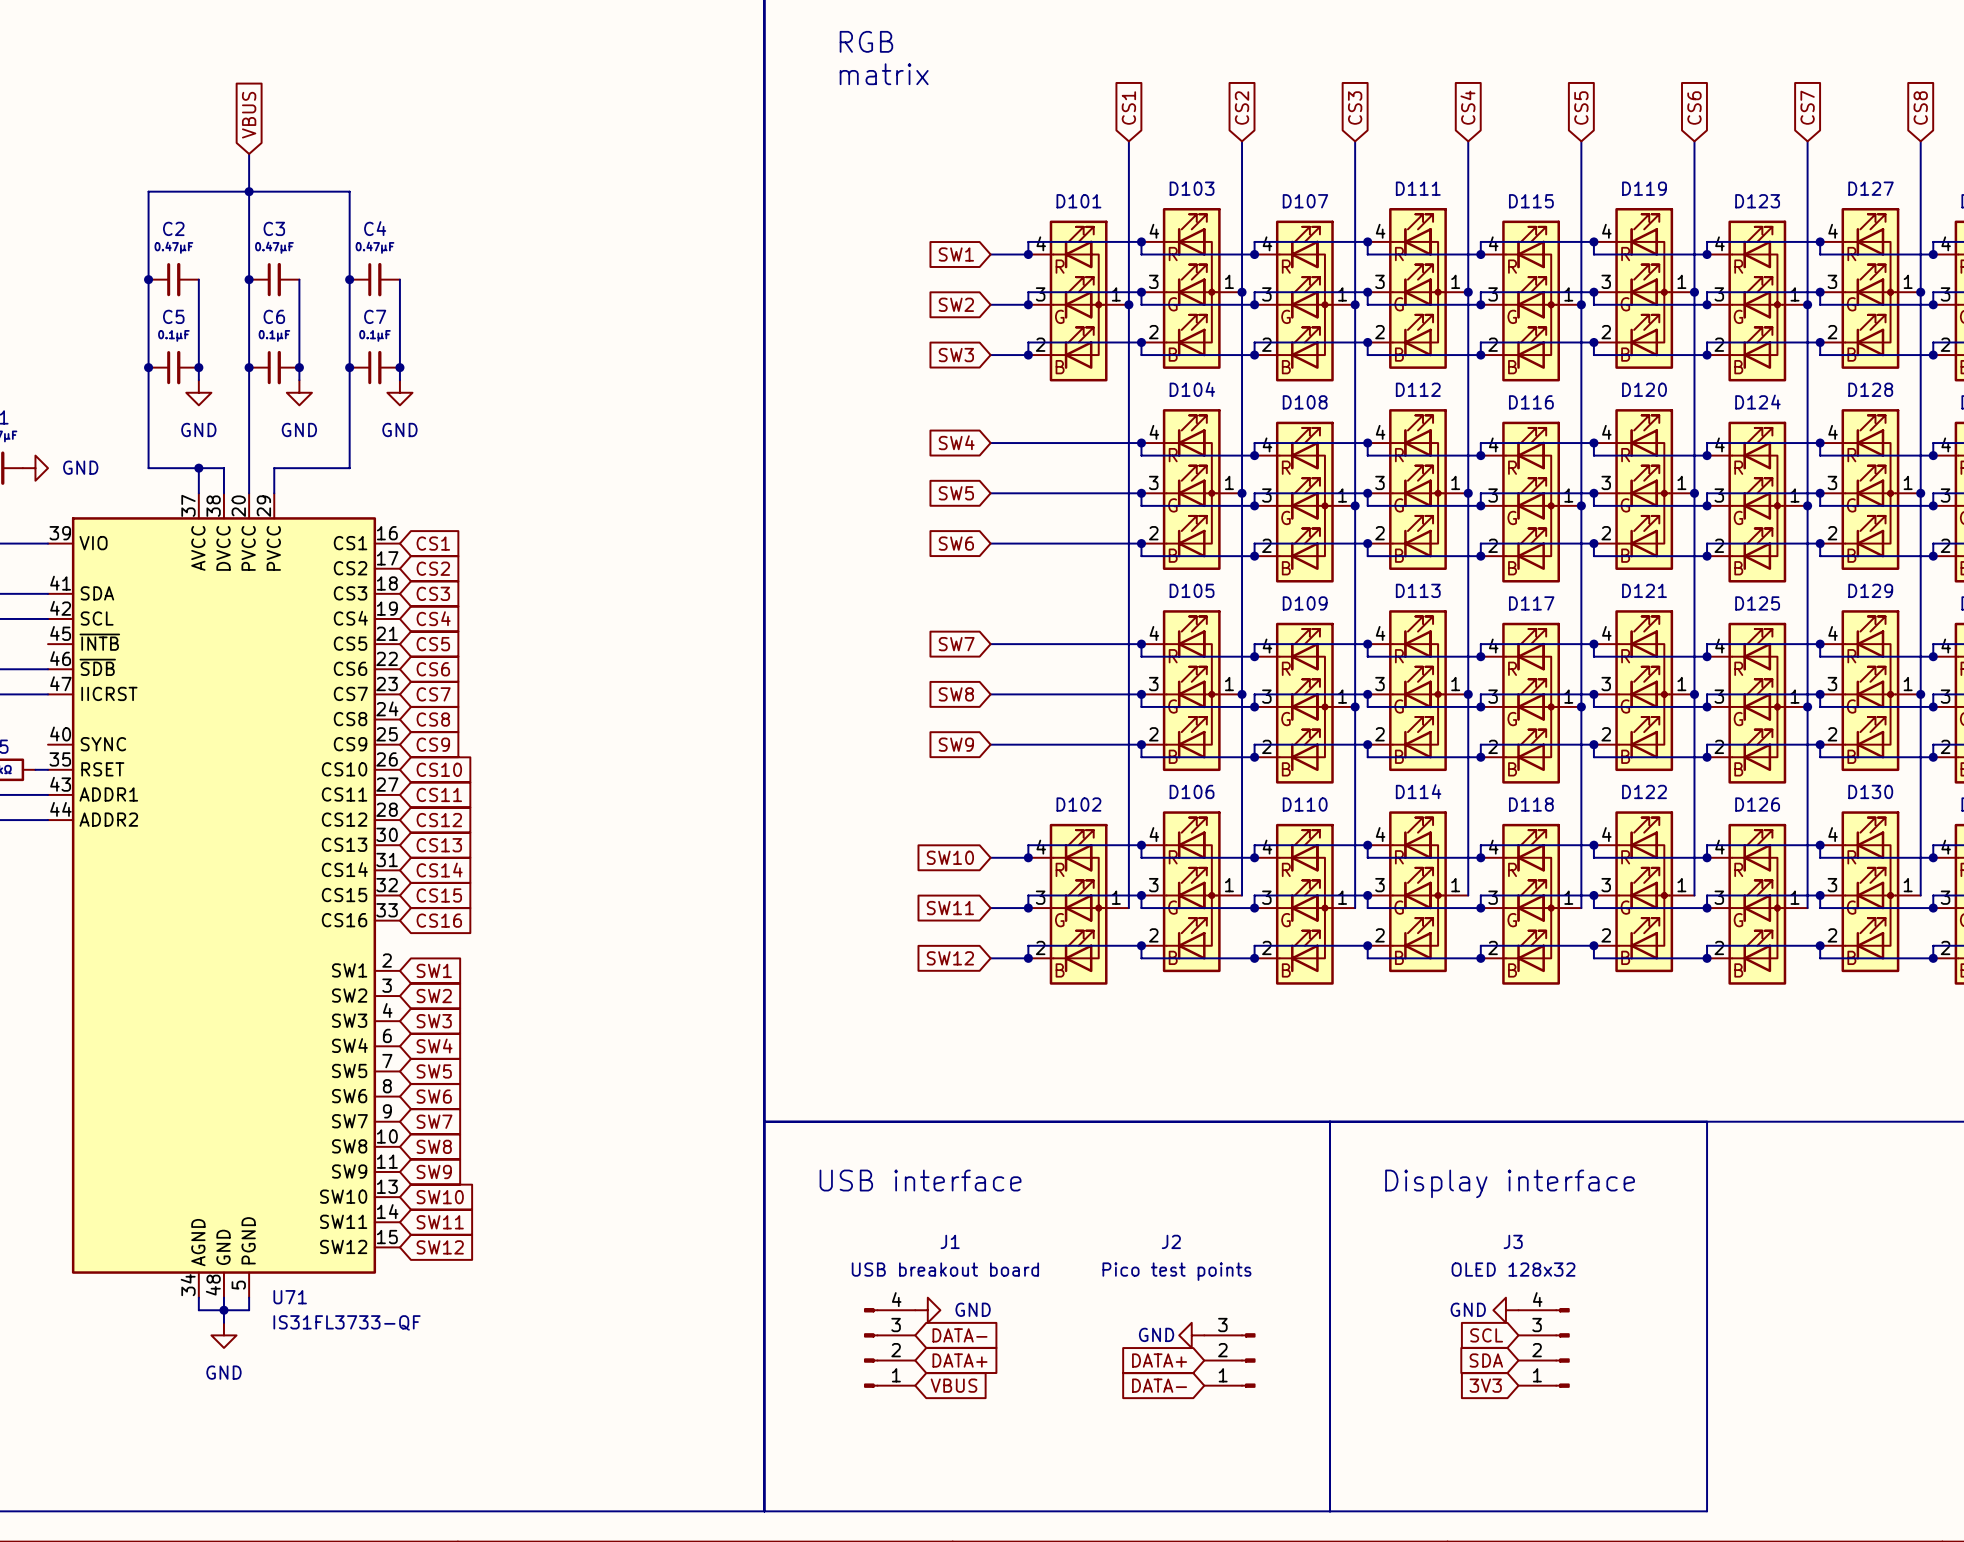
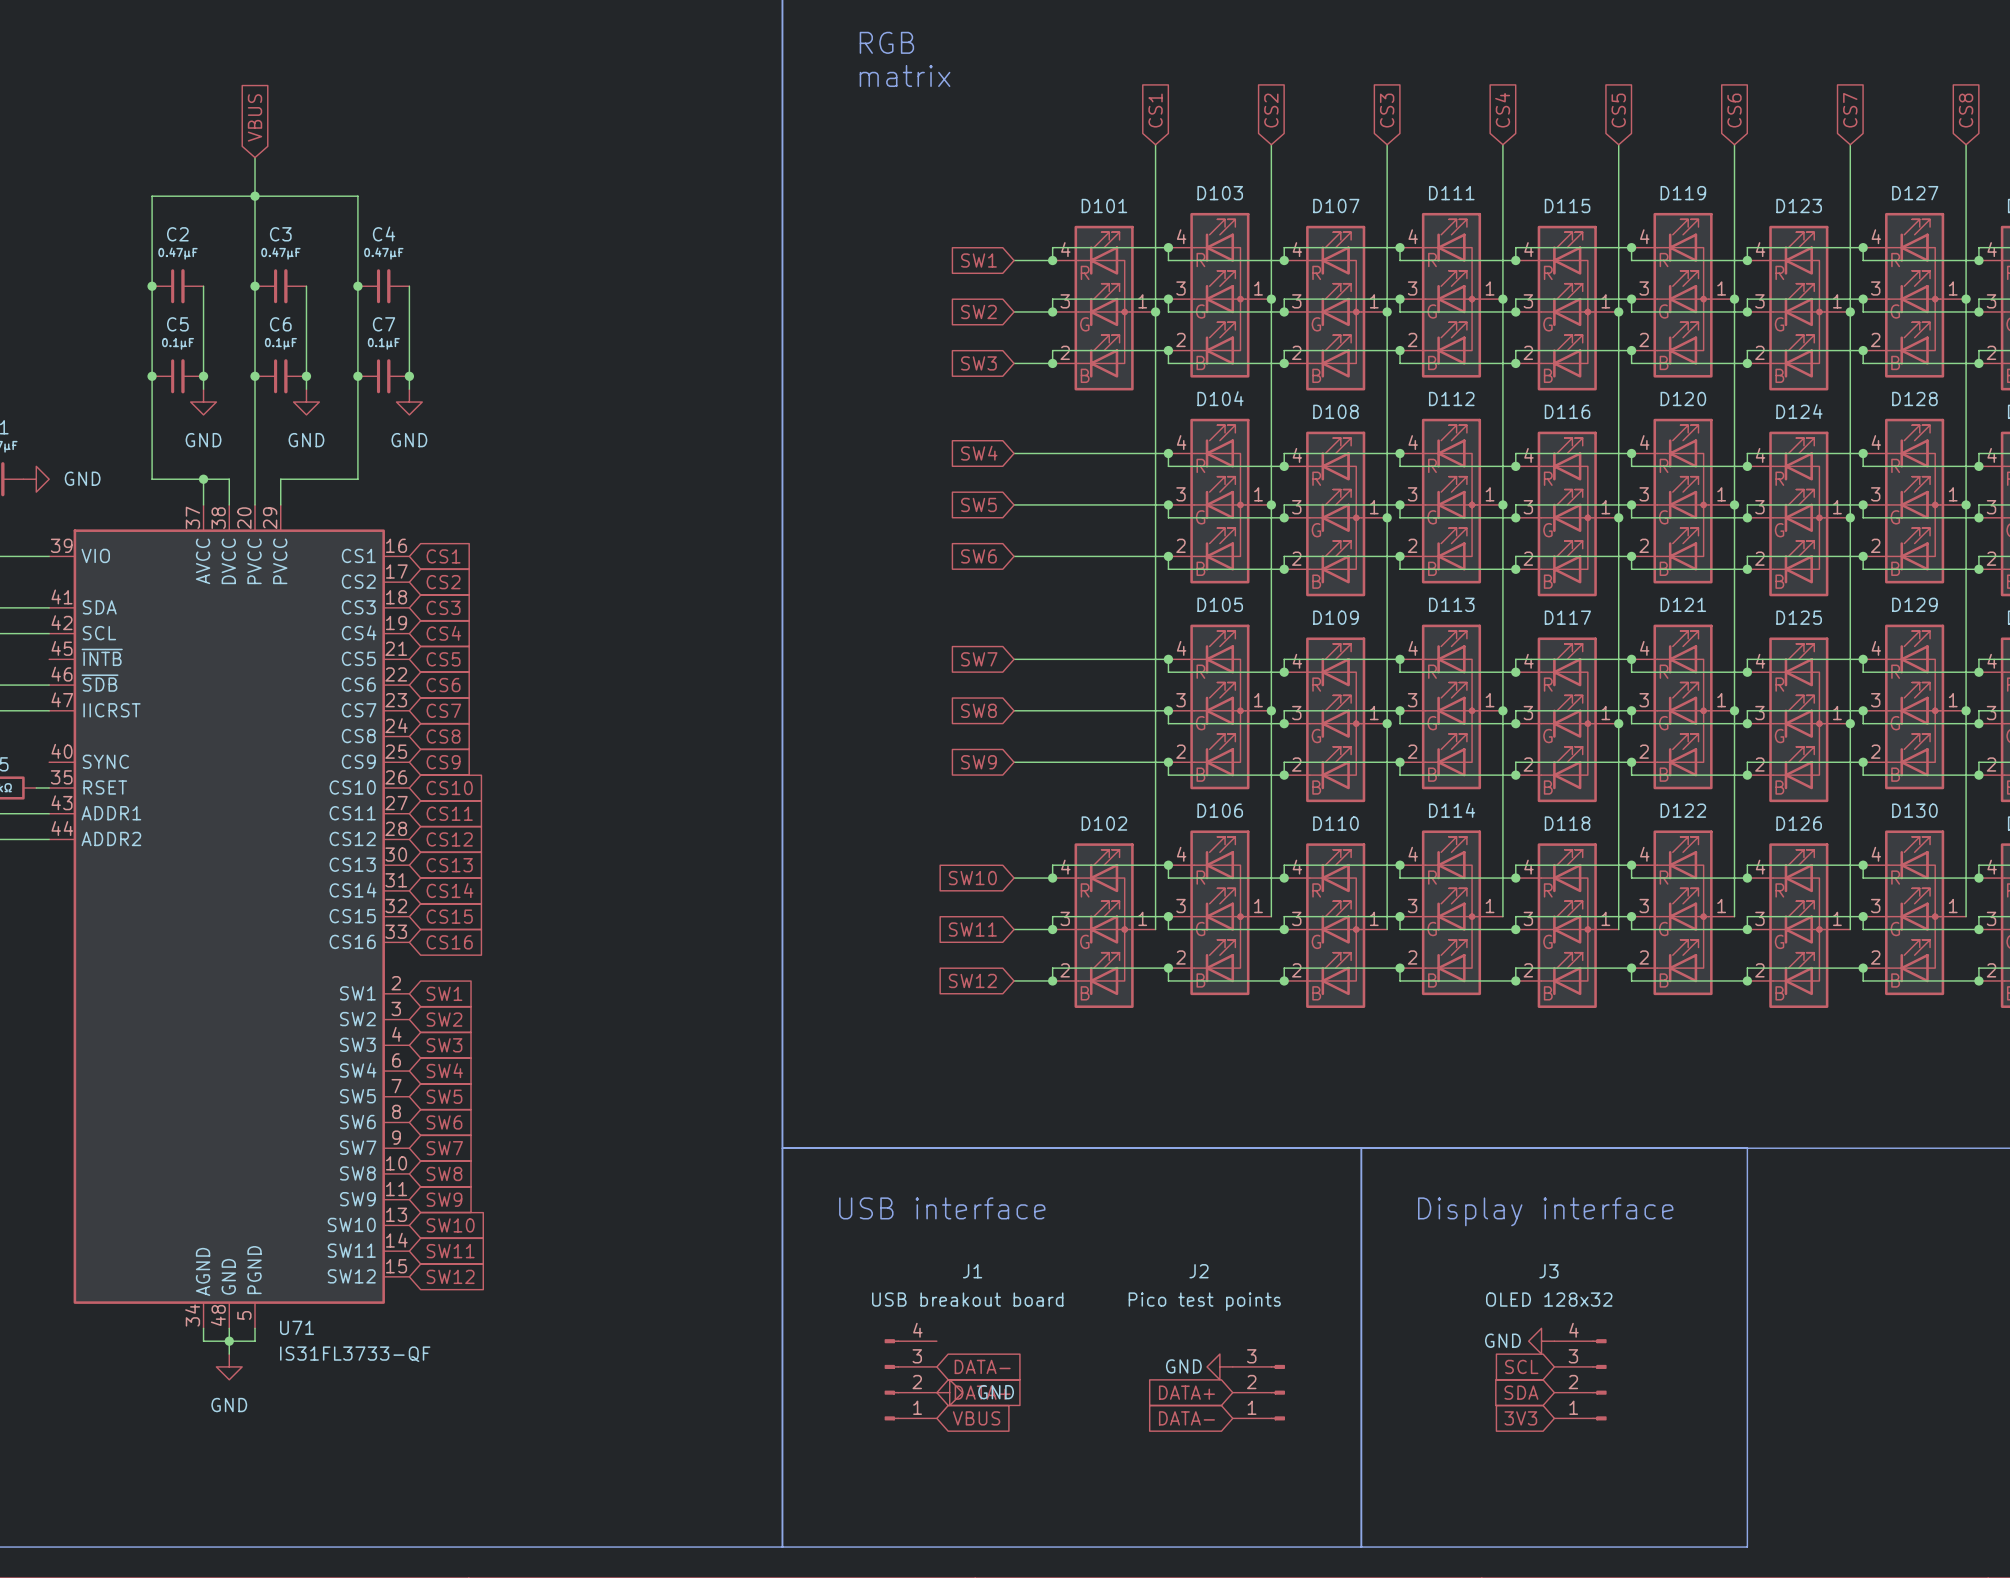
power symbol position: GND (927, 1310) -> GND (949, 1392)

